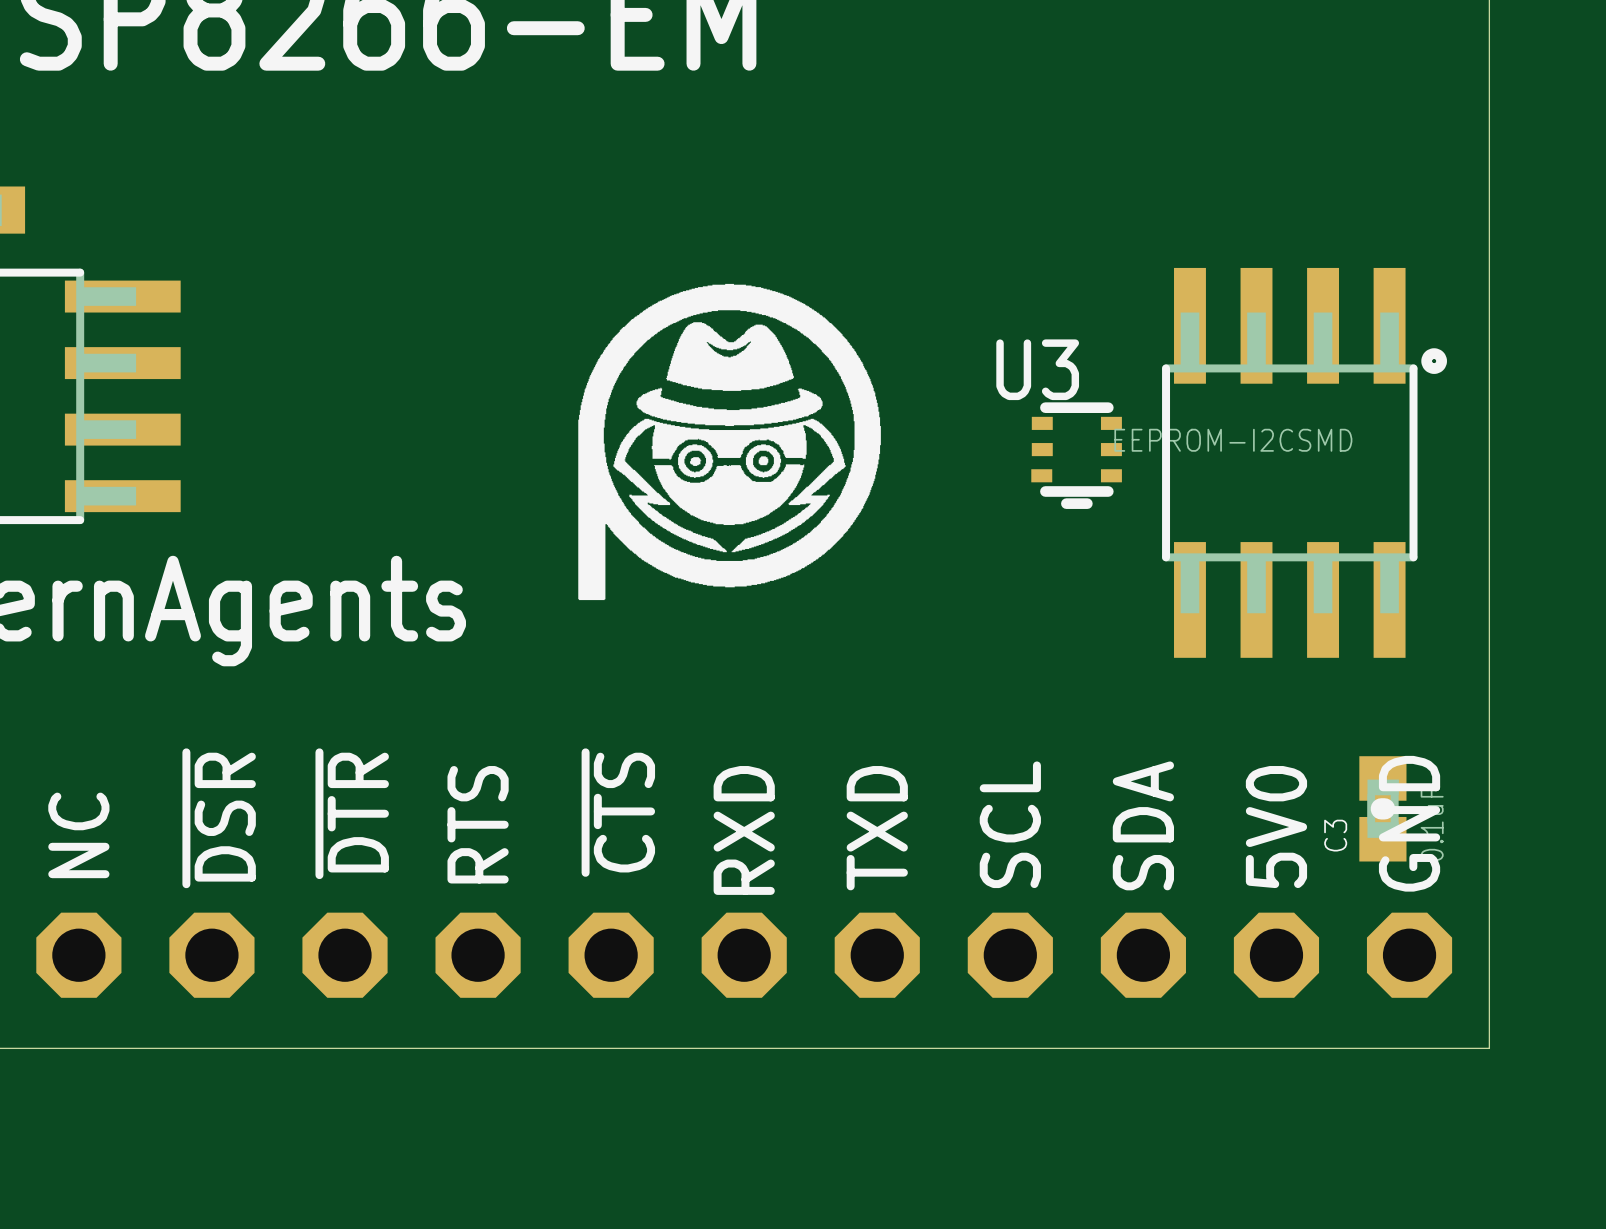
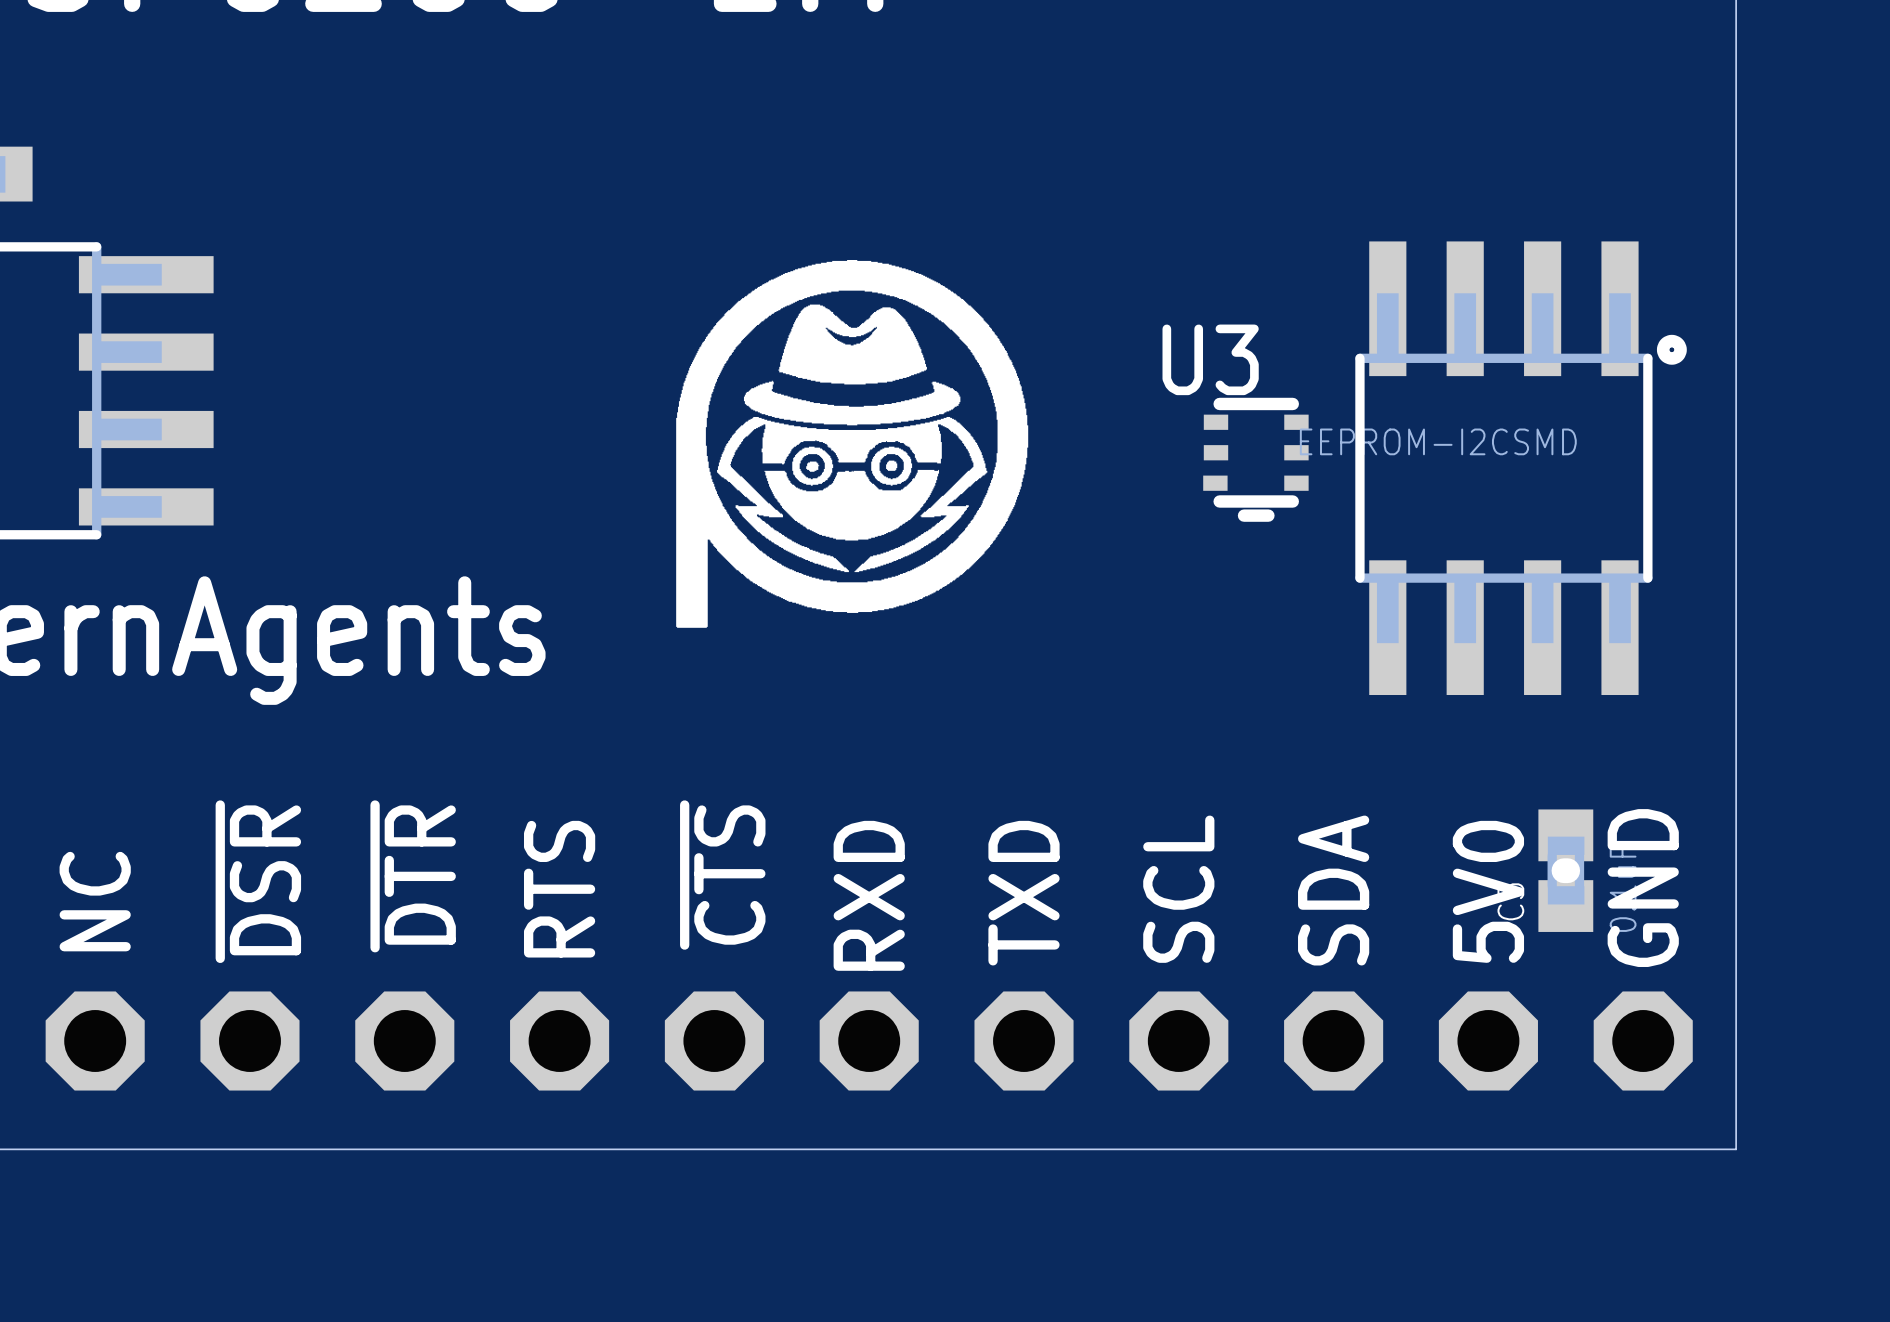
C3 position: (1382, 808) -> (1565, 870)

